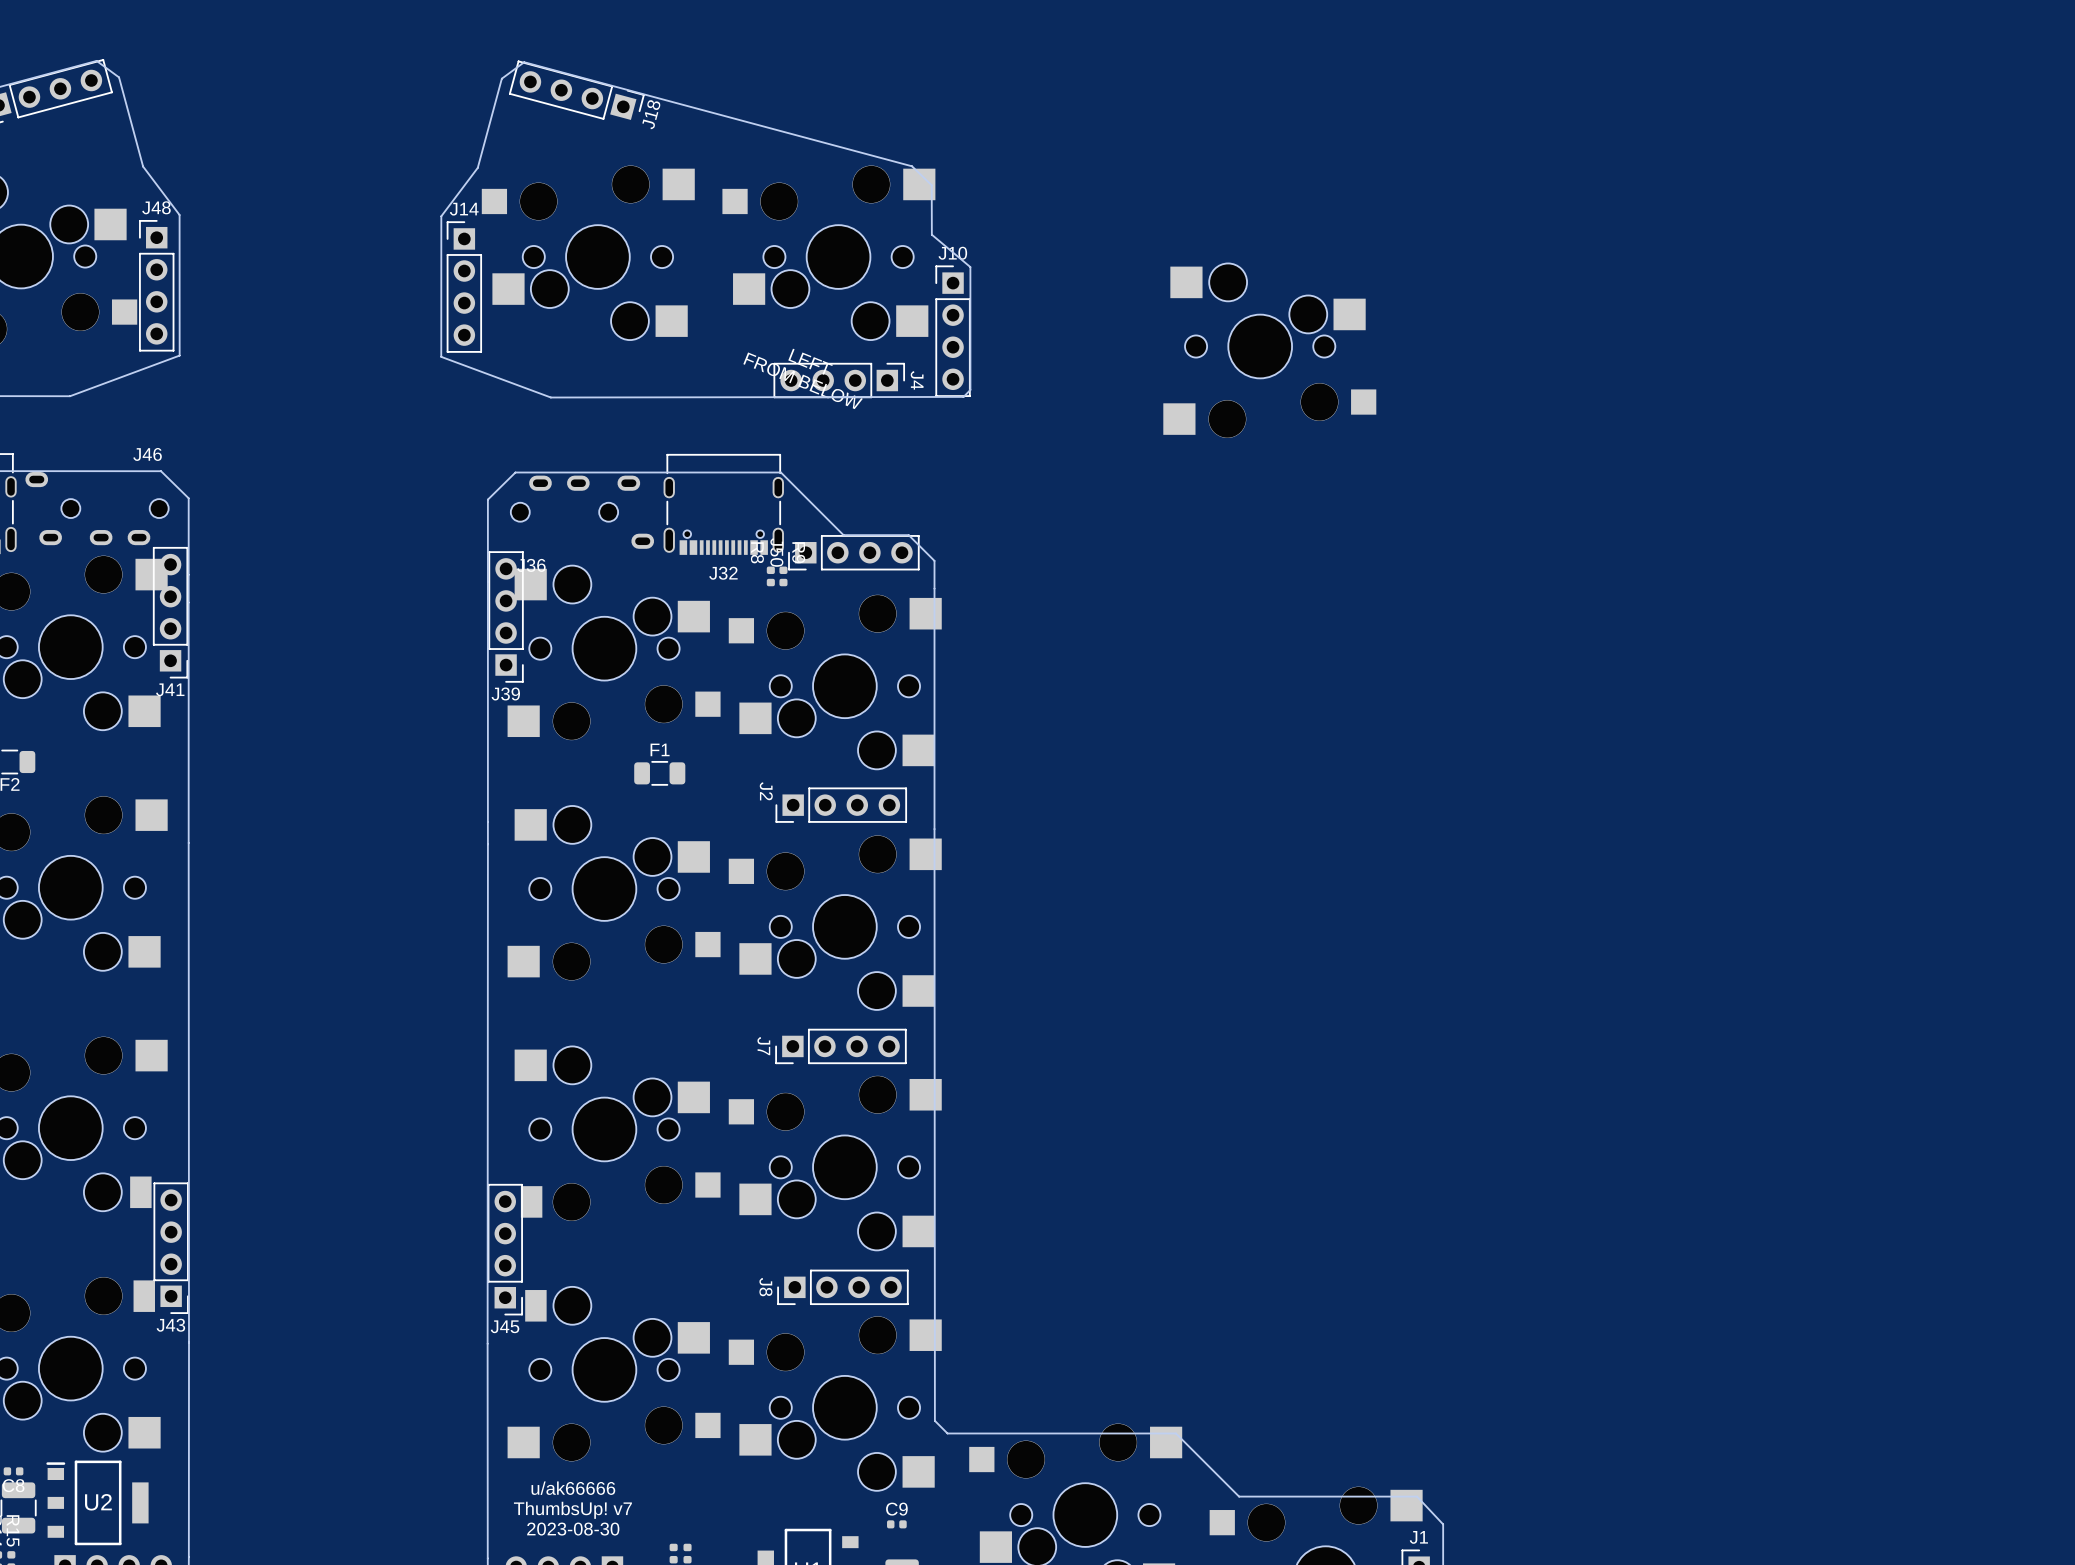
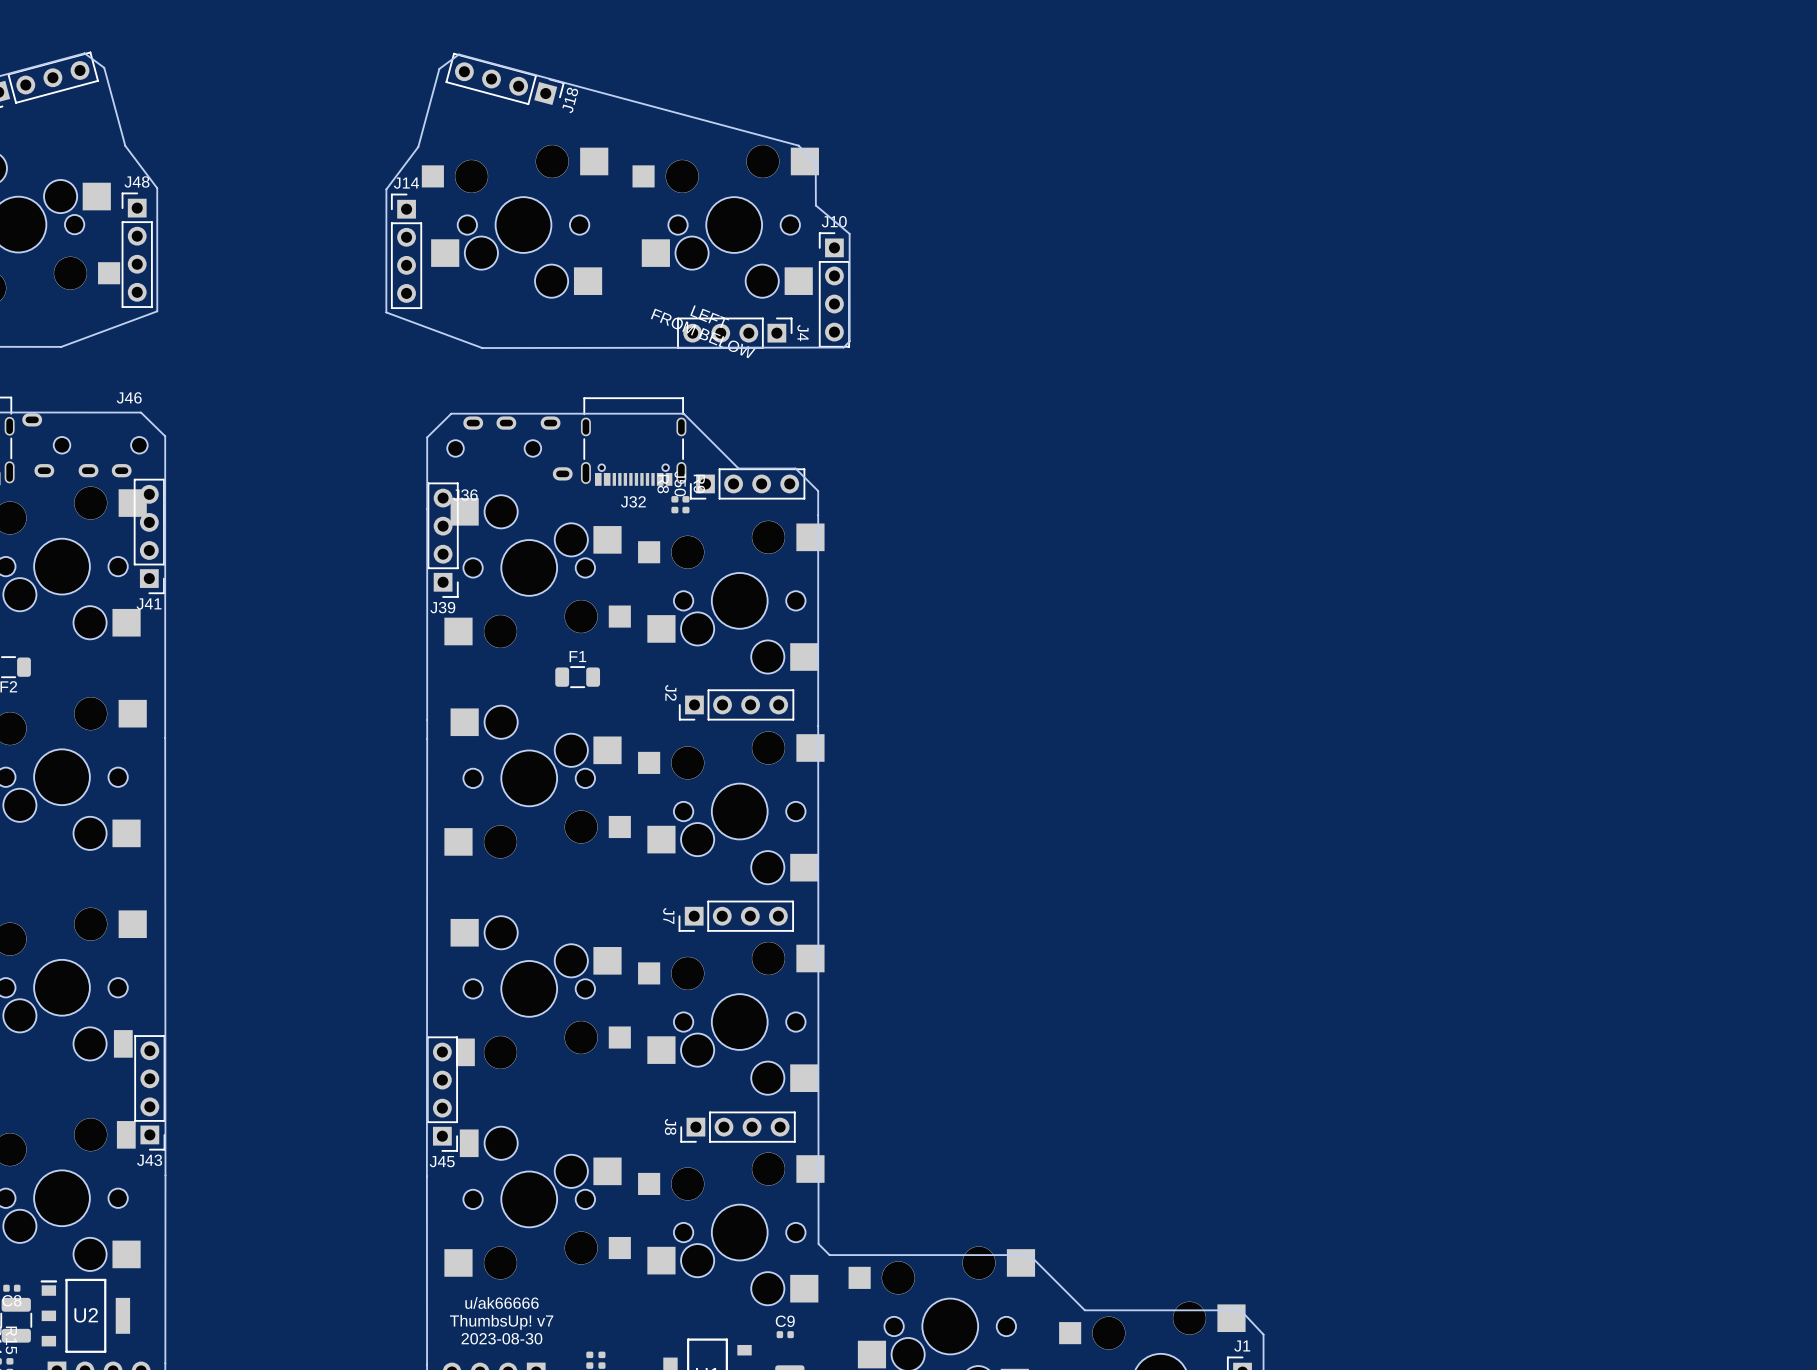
part: (1269, 350) -> none

